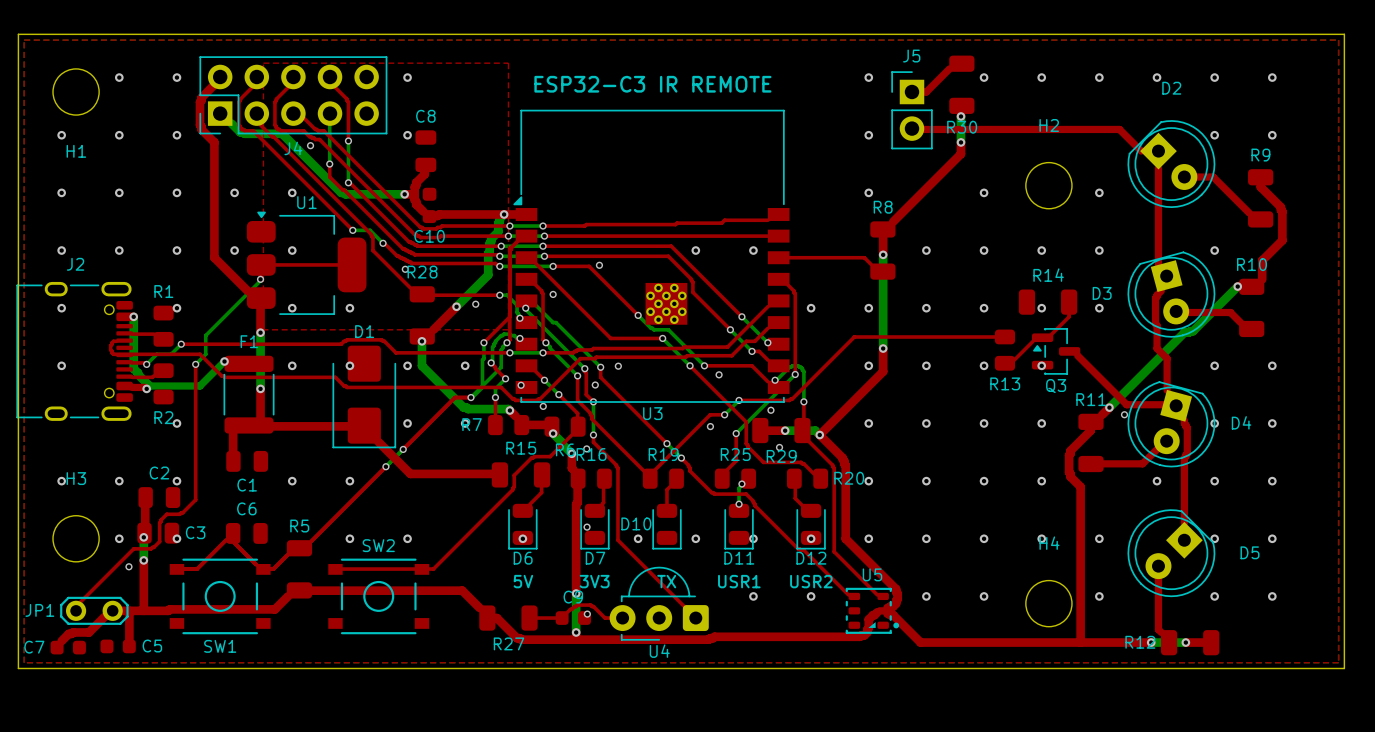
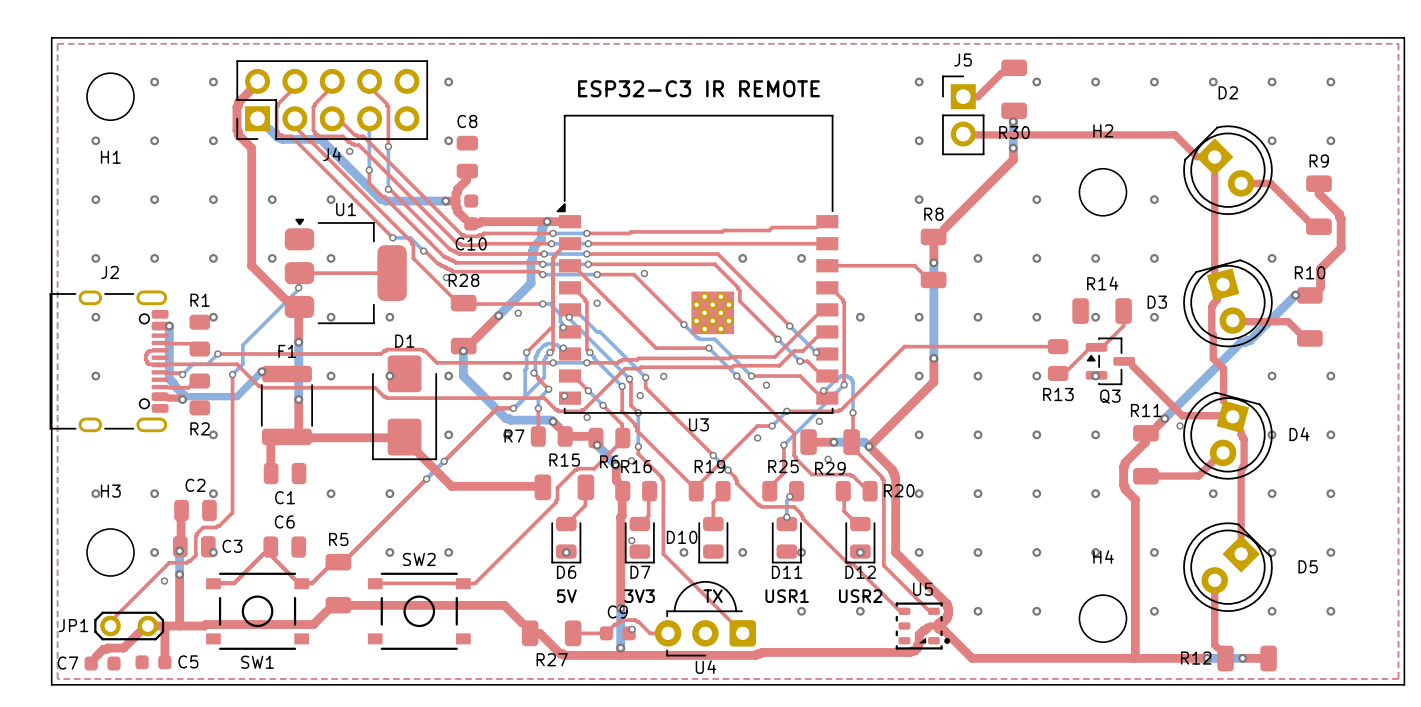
top zone outline: (263, 63) (508, 63) (508, 329) (263, 329) (263, 63) -> none

